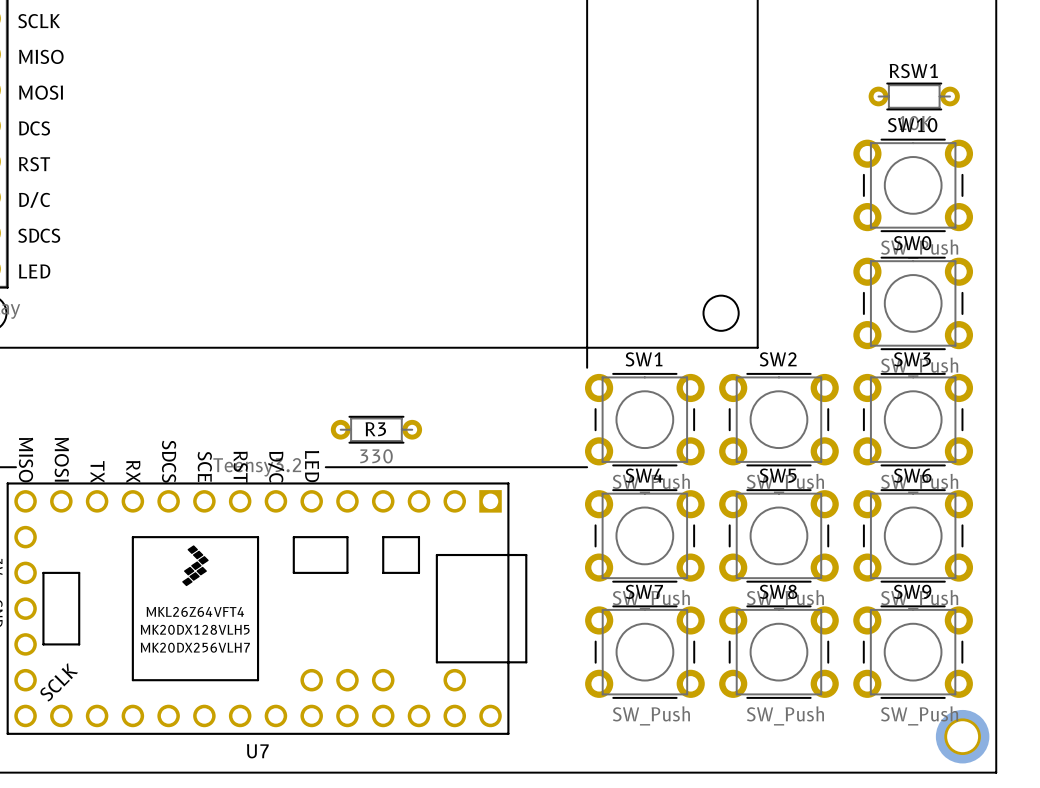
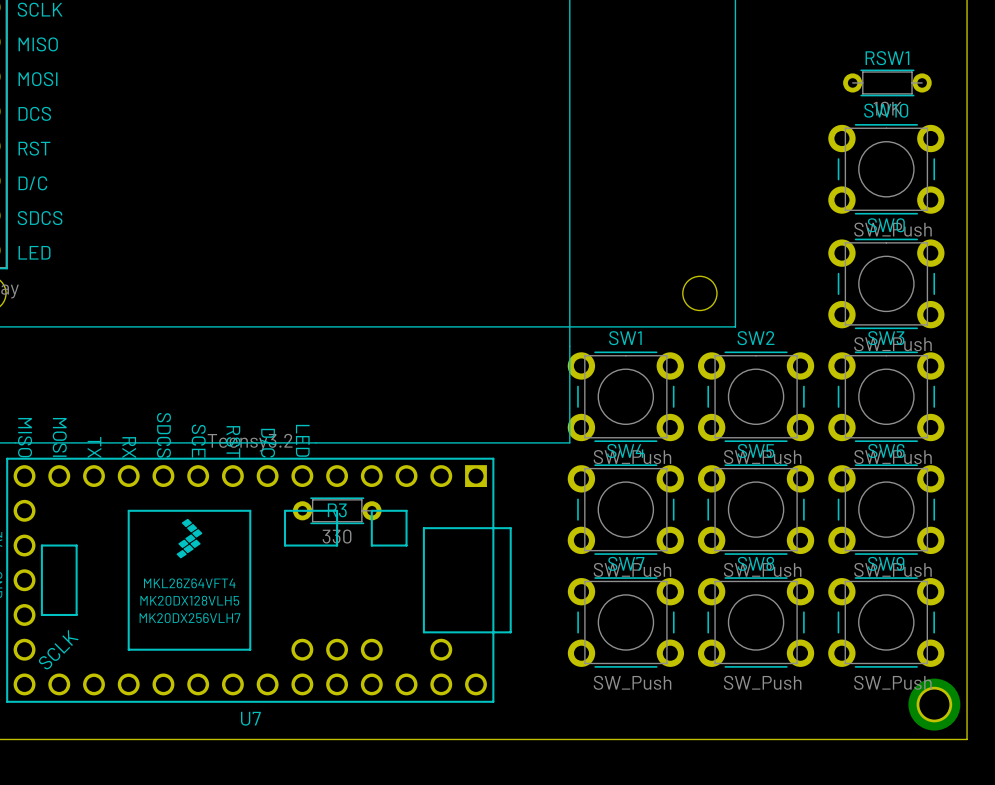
line: none -> (569, 346) (569, 442)
R3 position: (376, 429) -> (337, 510)
line: none -> (316, 442) (15, 442)

